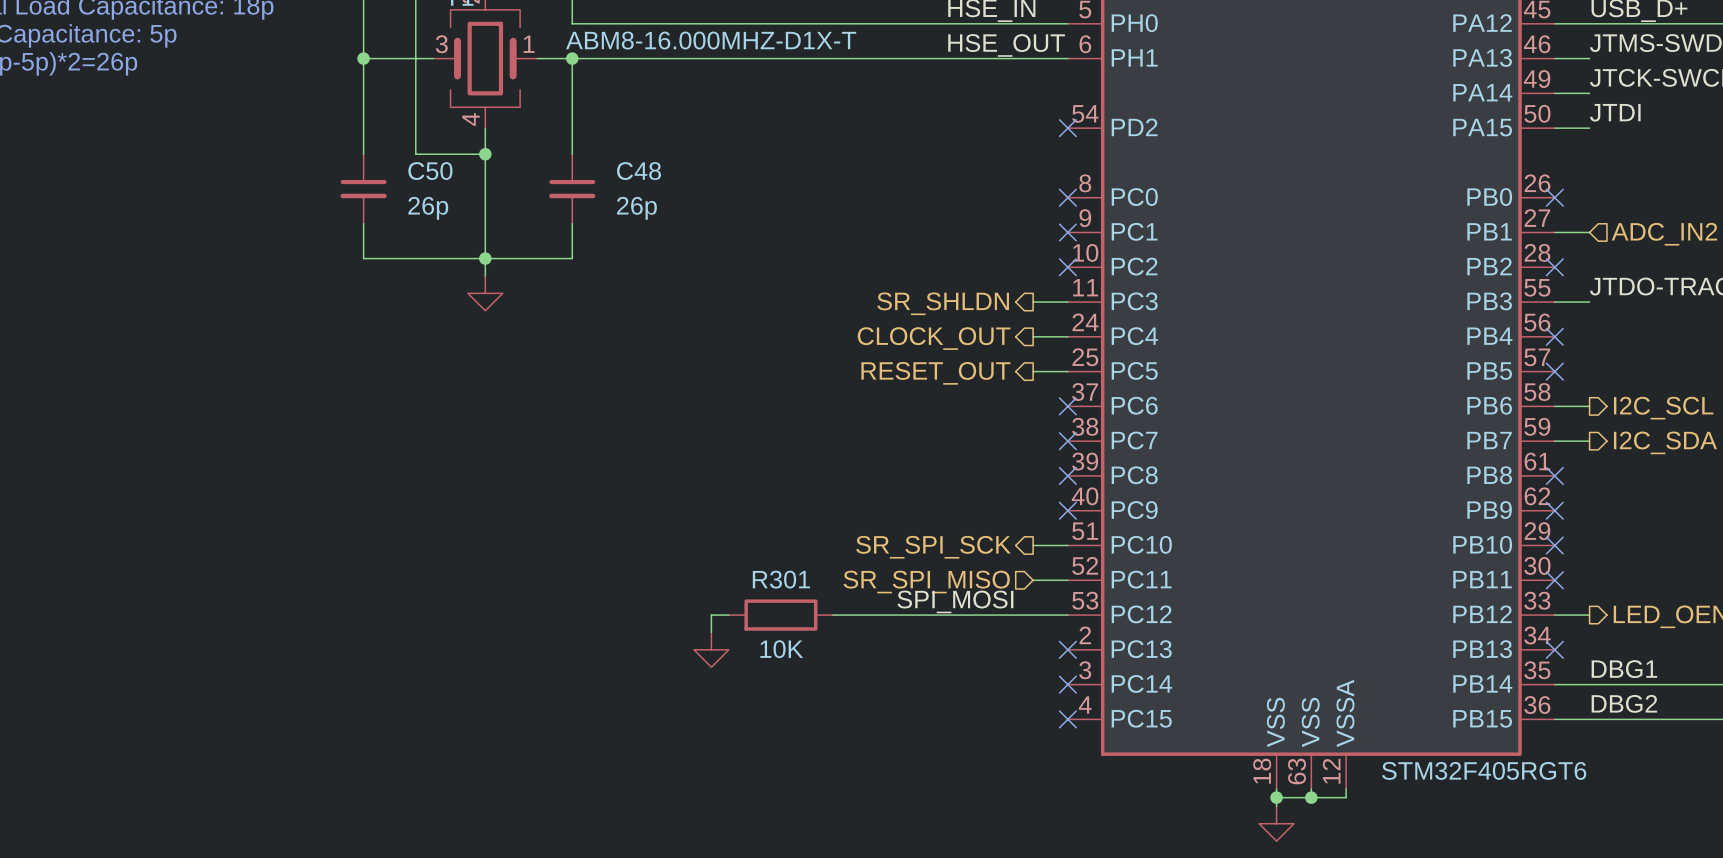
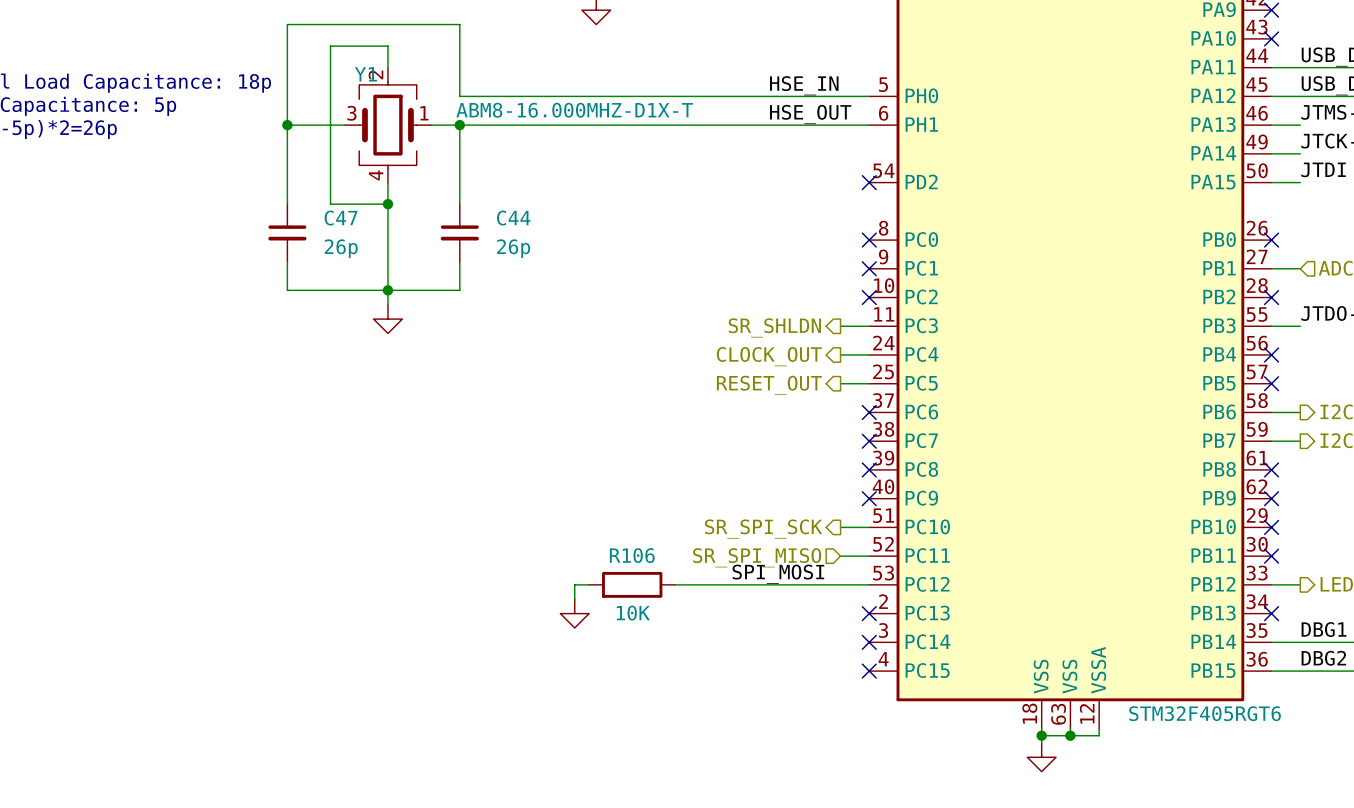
C50 name: C50 (430, 171) -> C47 (341, 218)
C48 name: C48 (639, 171) -> C44 (513, 218)
R301 name: R301 (781, 579) -> R106 (632, 555)

